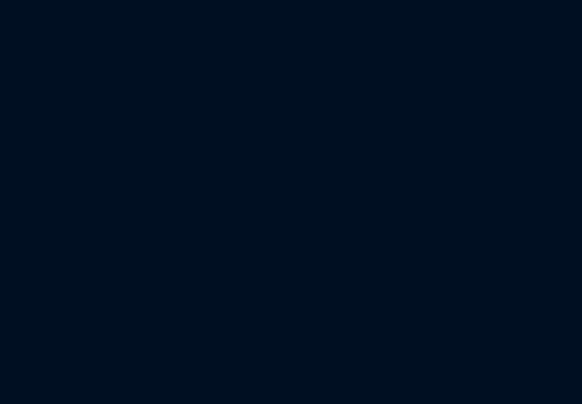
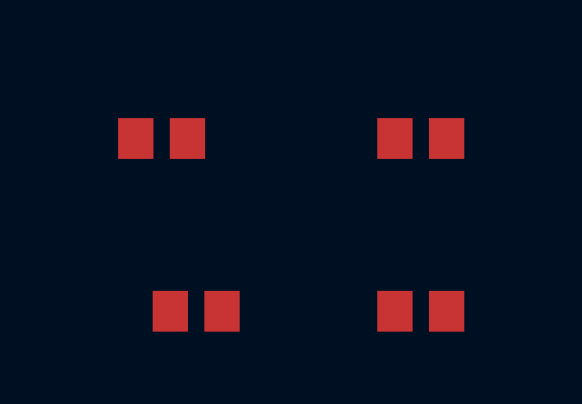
part: none -> (161, 138)
part: none -> (420, 138)
part: none -> (196, 311)
part: none -> (420, 311)

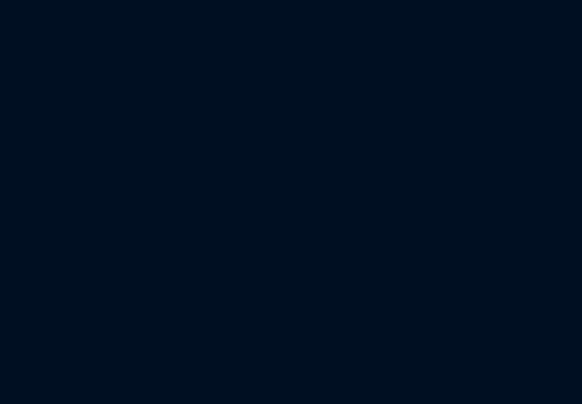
part: (161, 138) -> none
part: (420, 138) -> none
part: (196, 311) -> none
part: (420, 311) -> none

